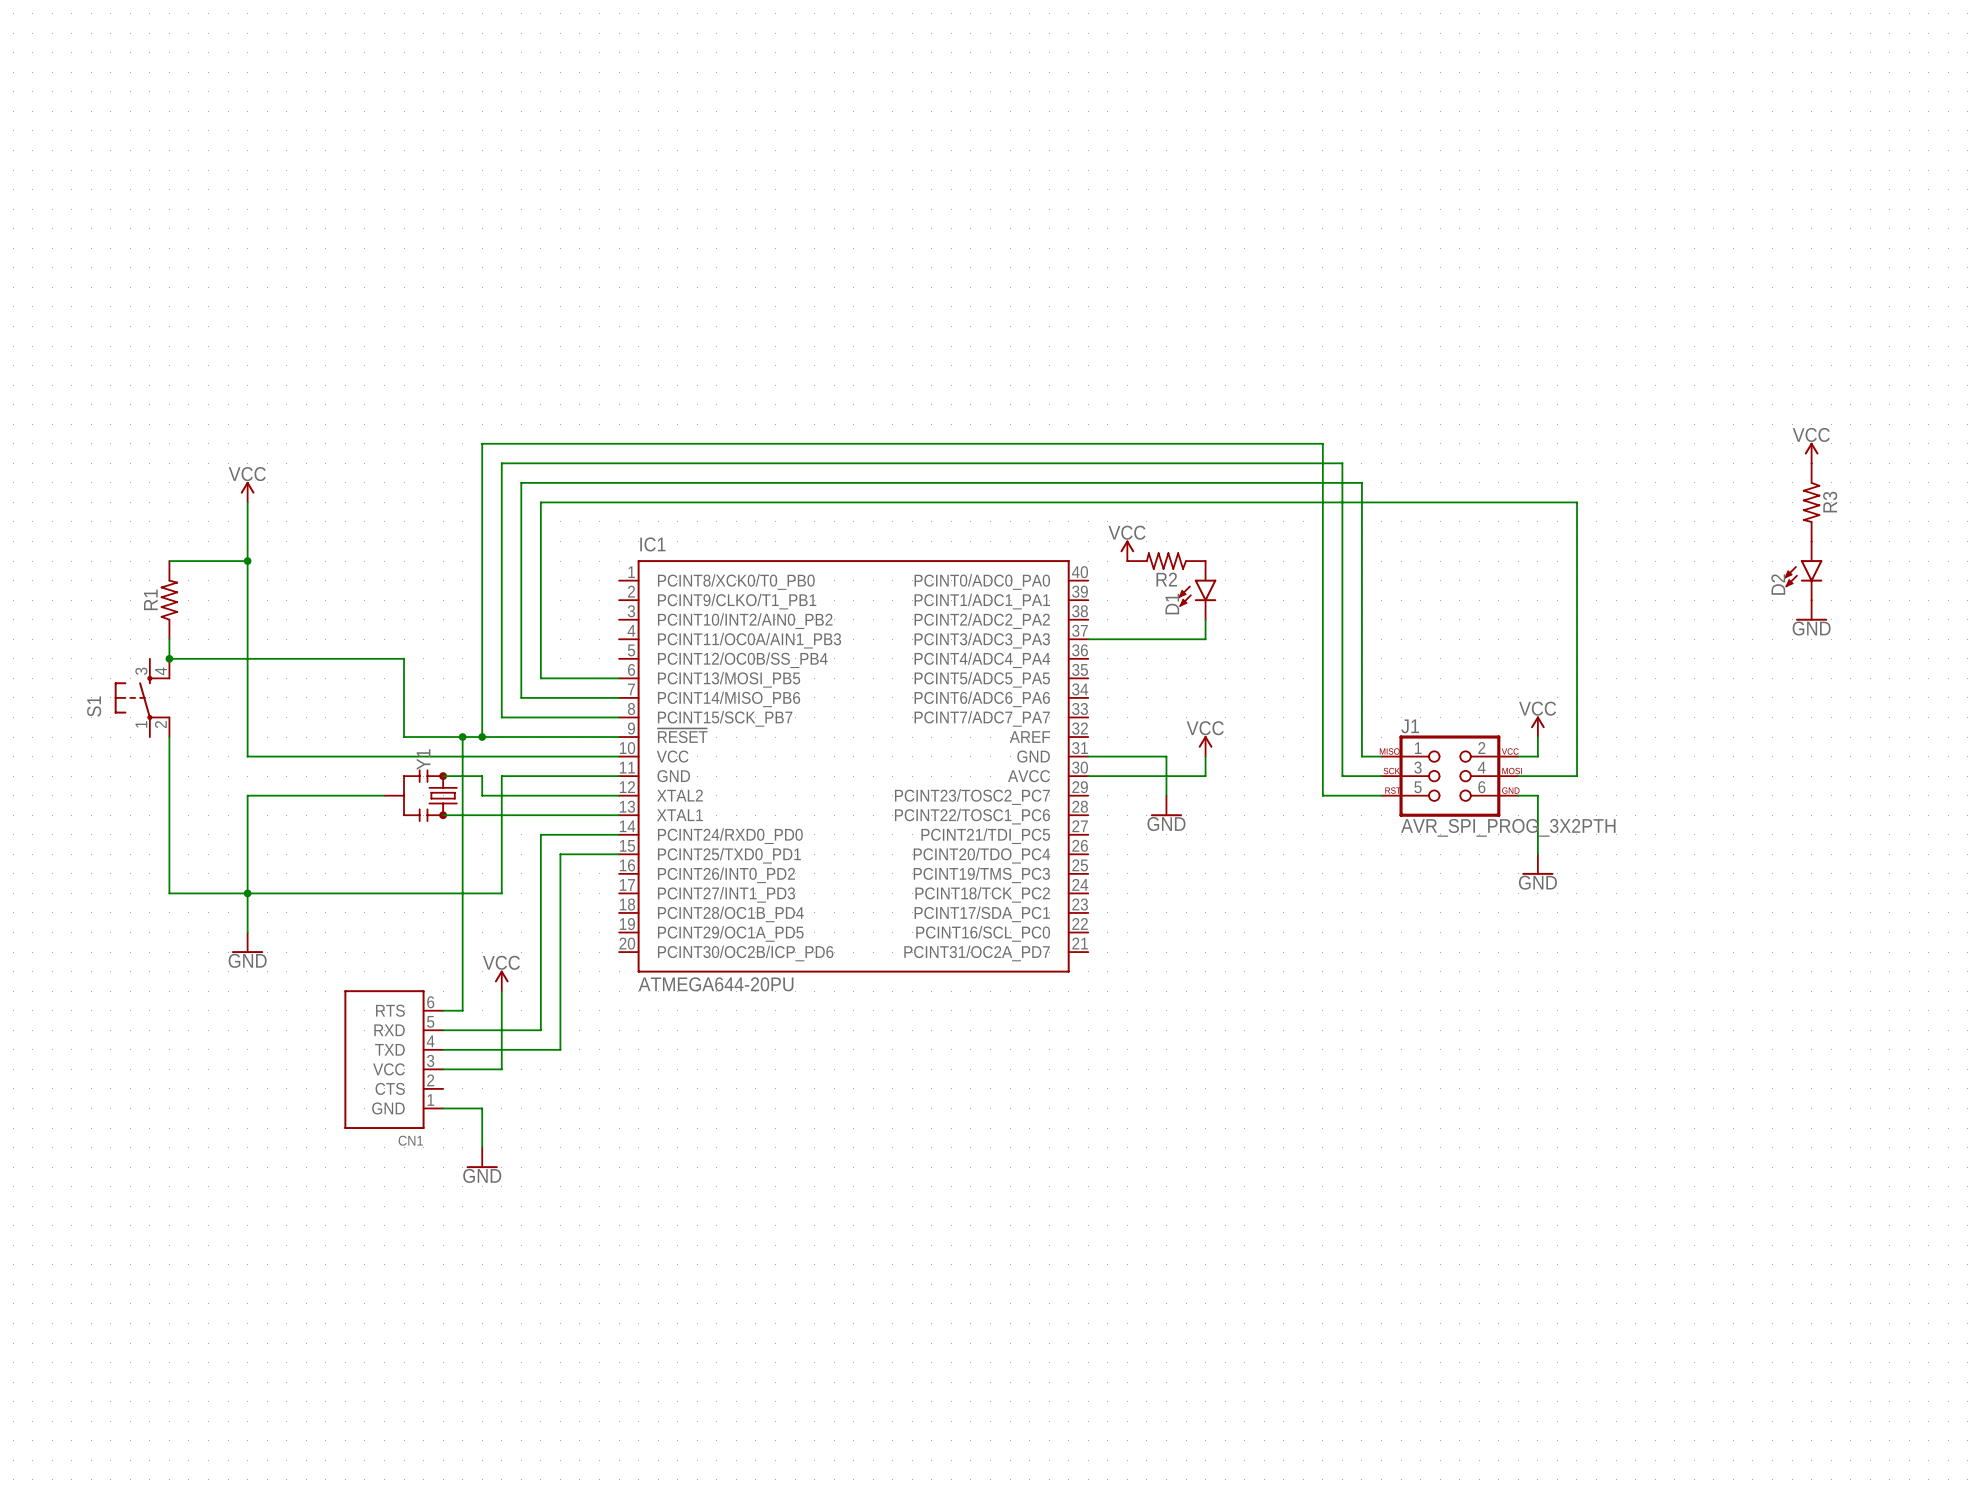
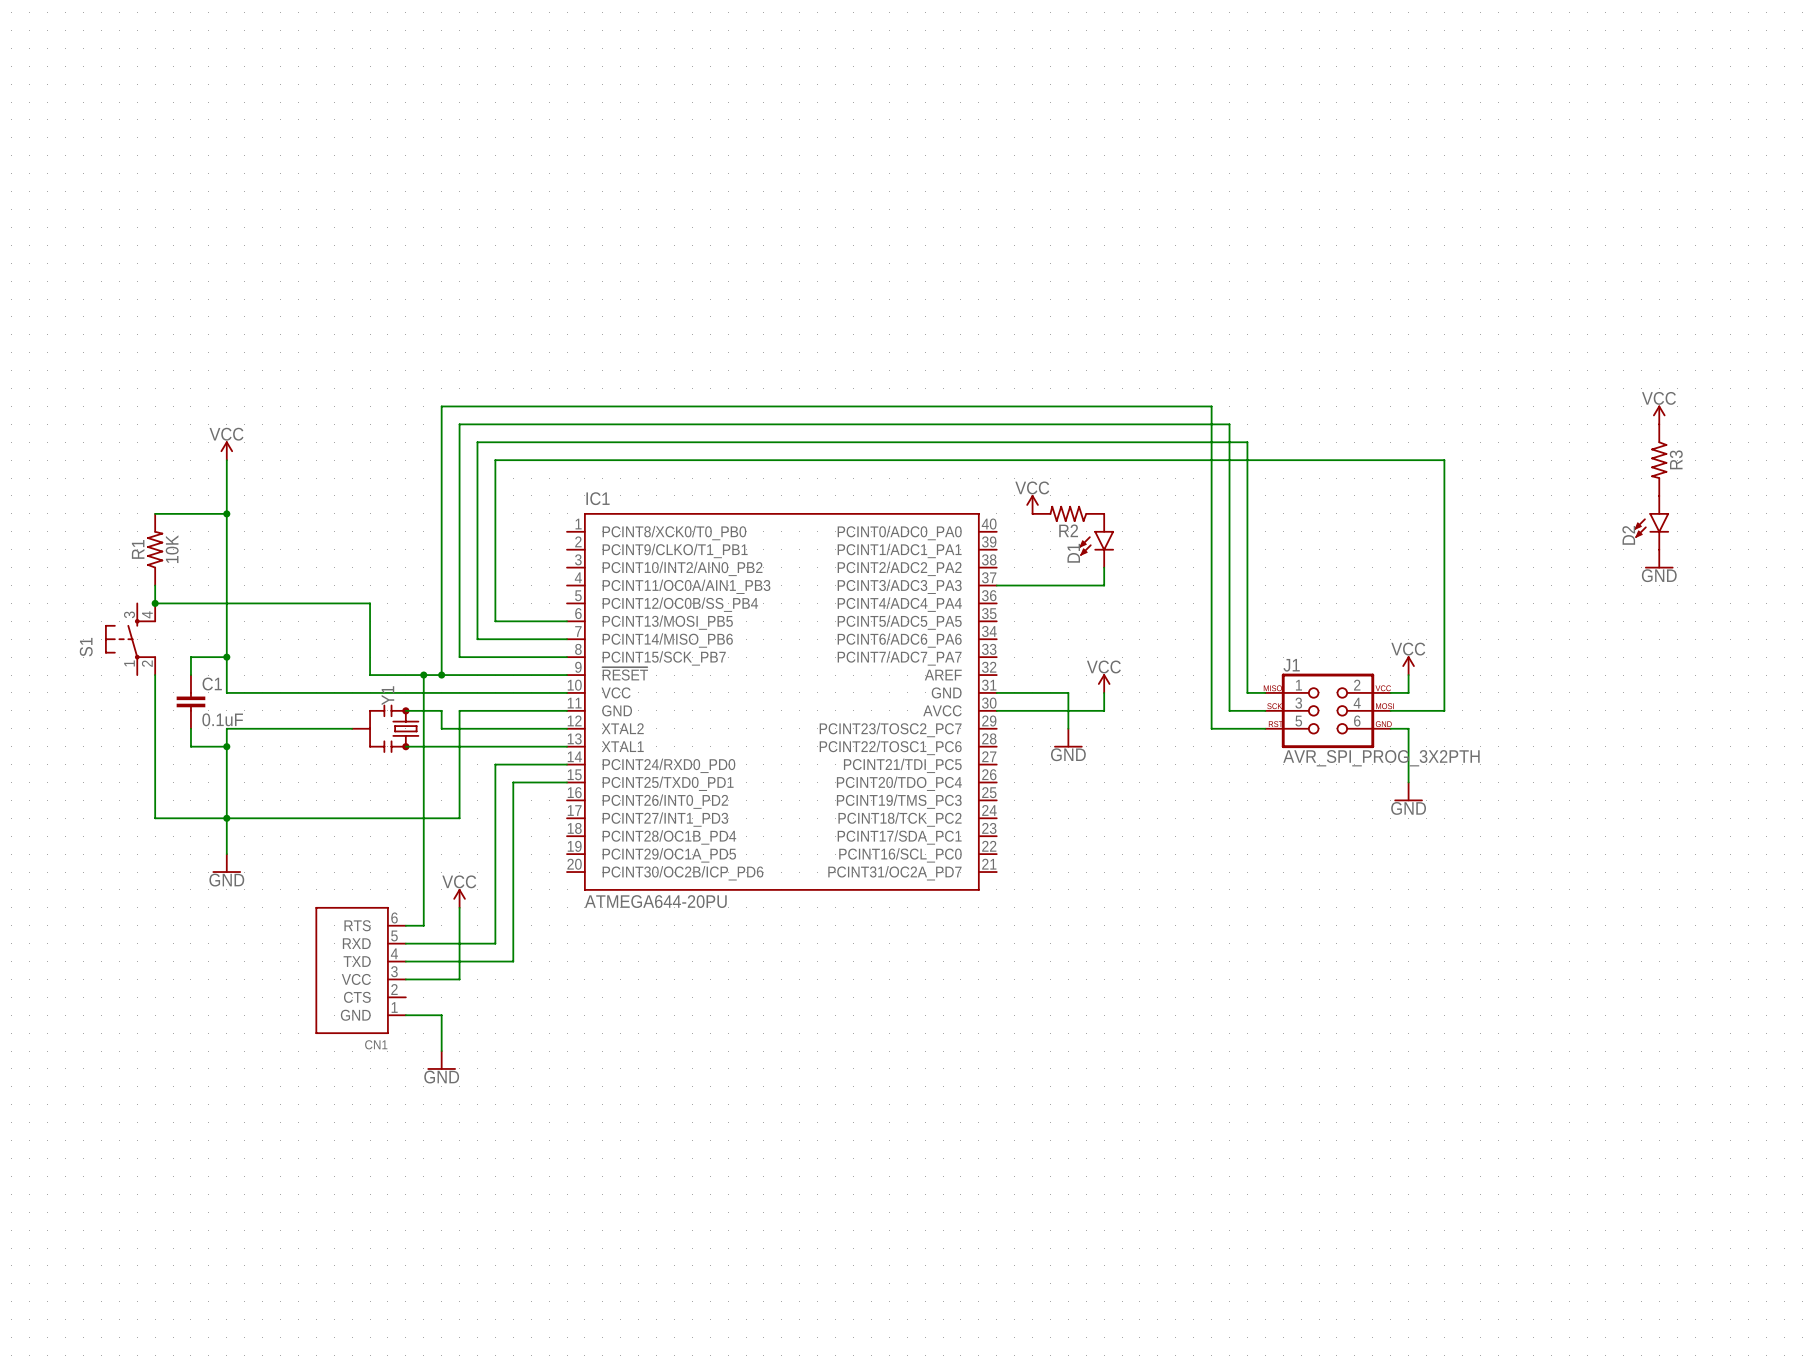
R1 value: none -> 10K (172, 549)
wire: none -> (226, 657) (190, 657) (190, 675)
junction: none -> (226, 657)
C1: none -> 0.1uF (190, 701)
wire: none -> (190, 728) (190, 746) (226, 746)
junction: none -> (226, 746)

